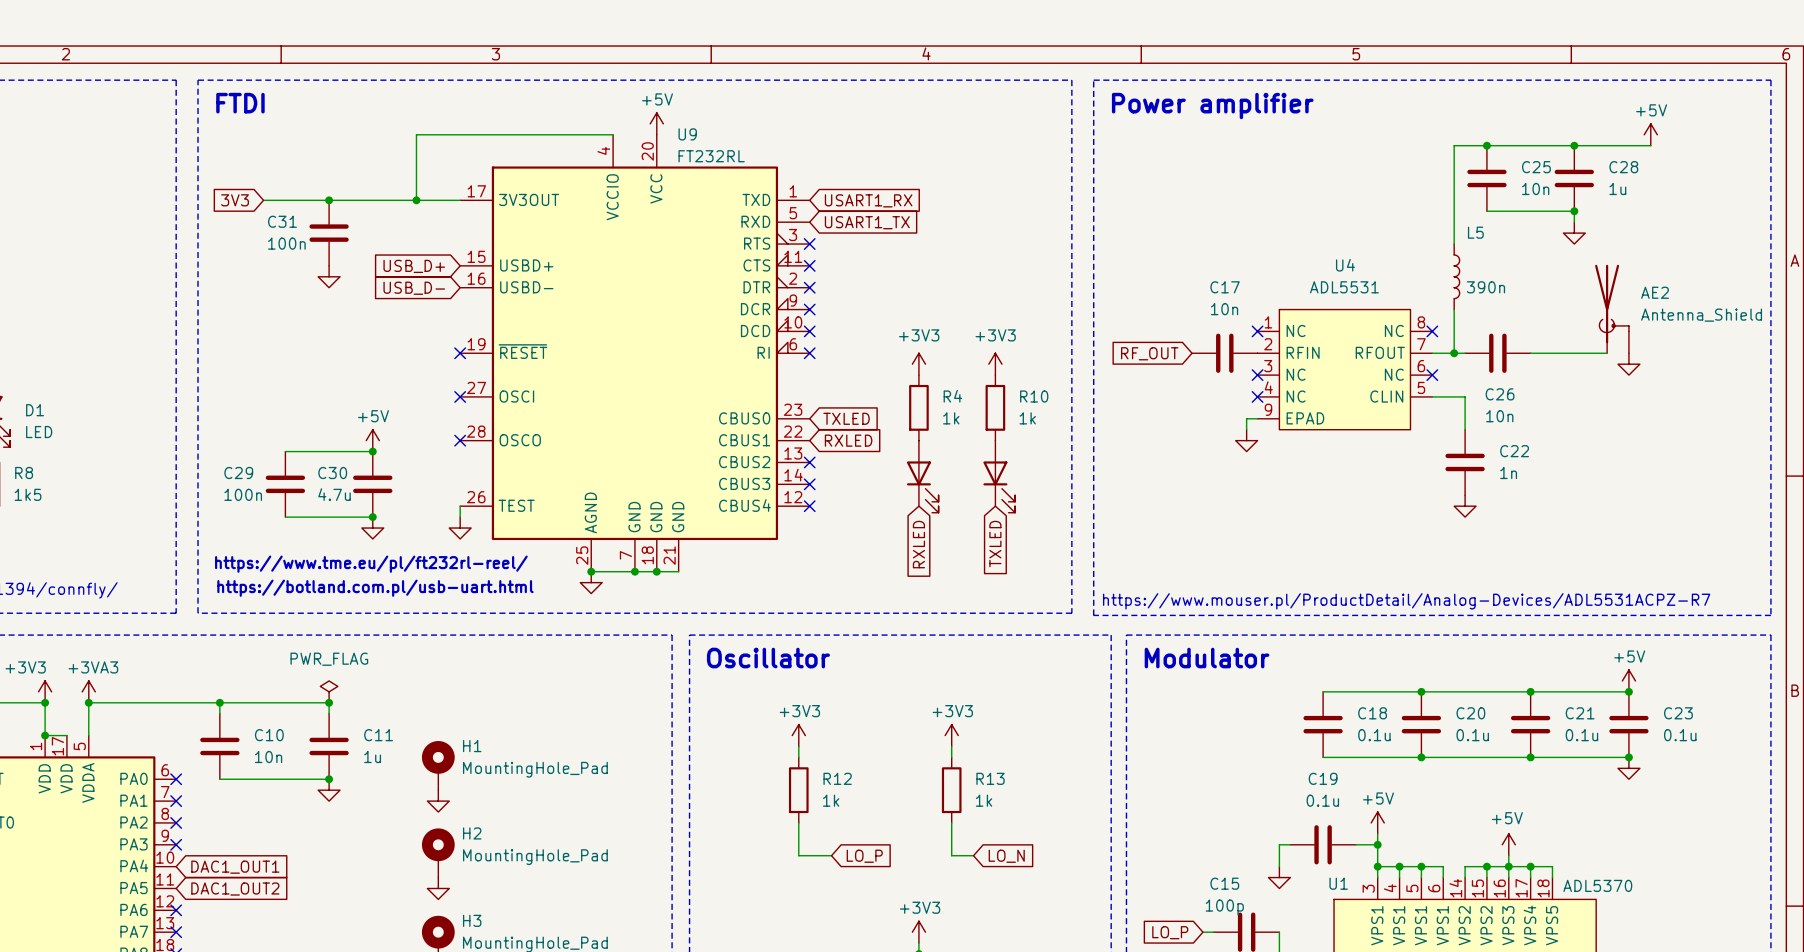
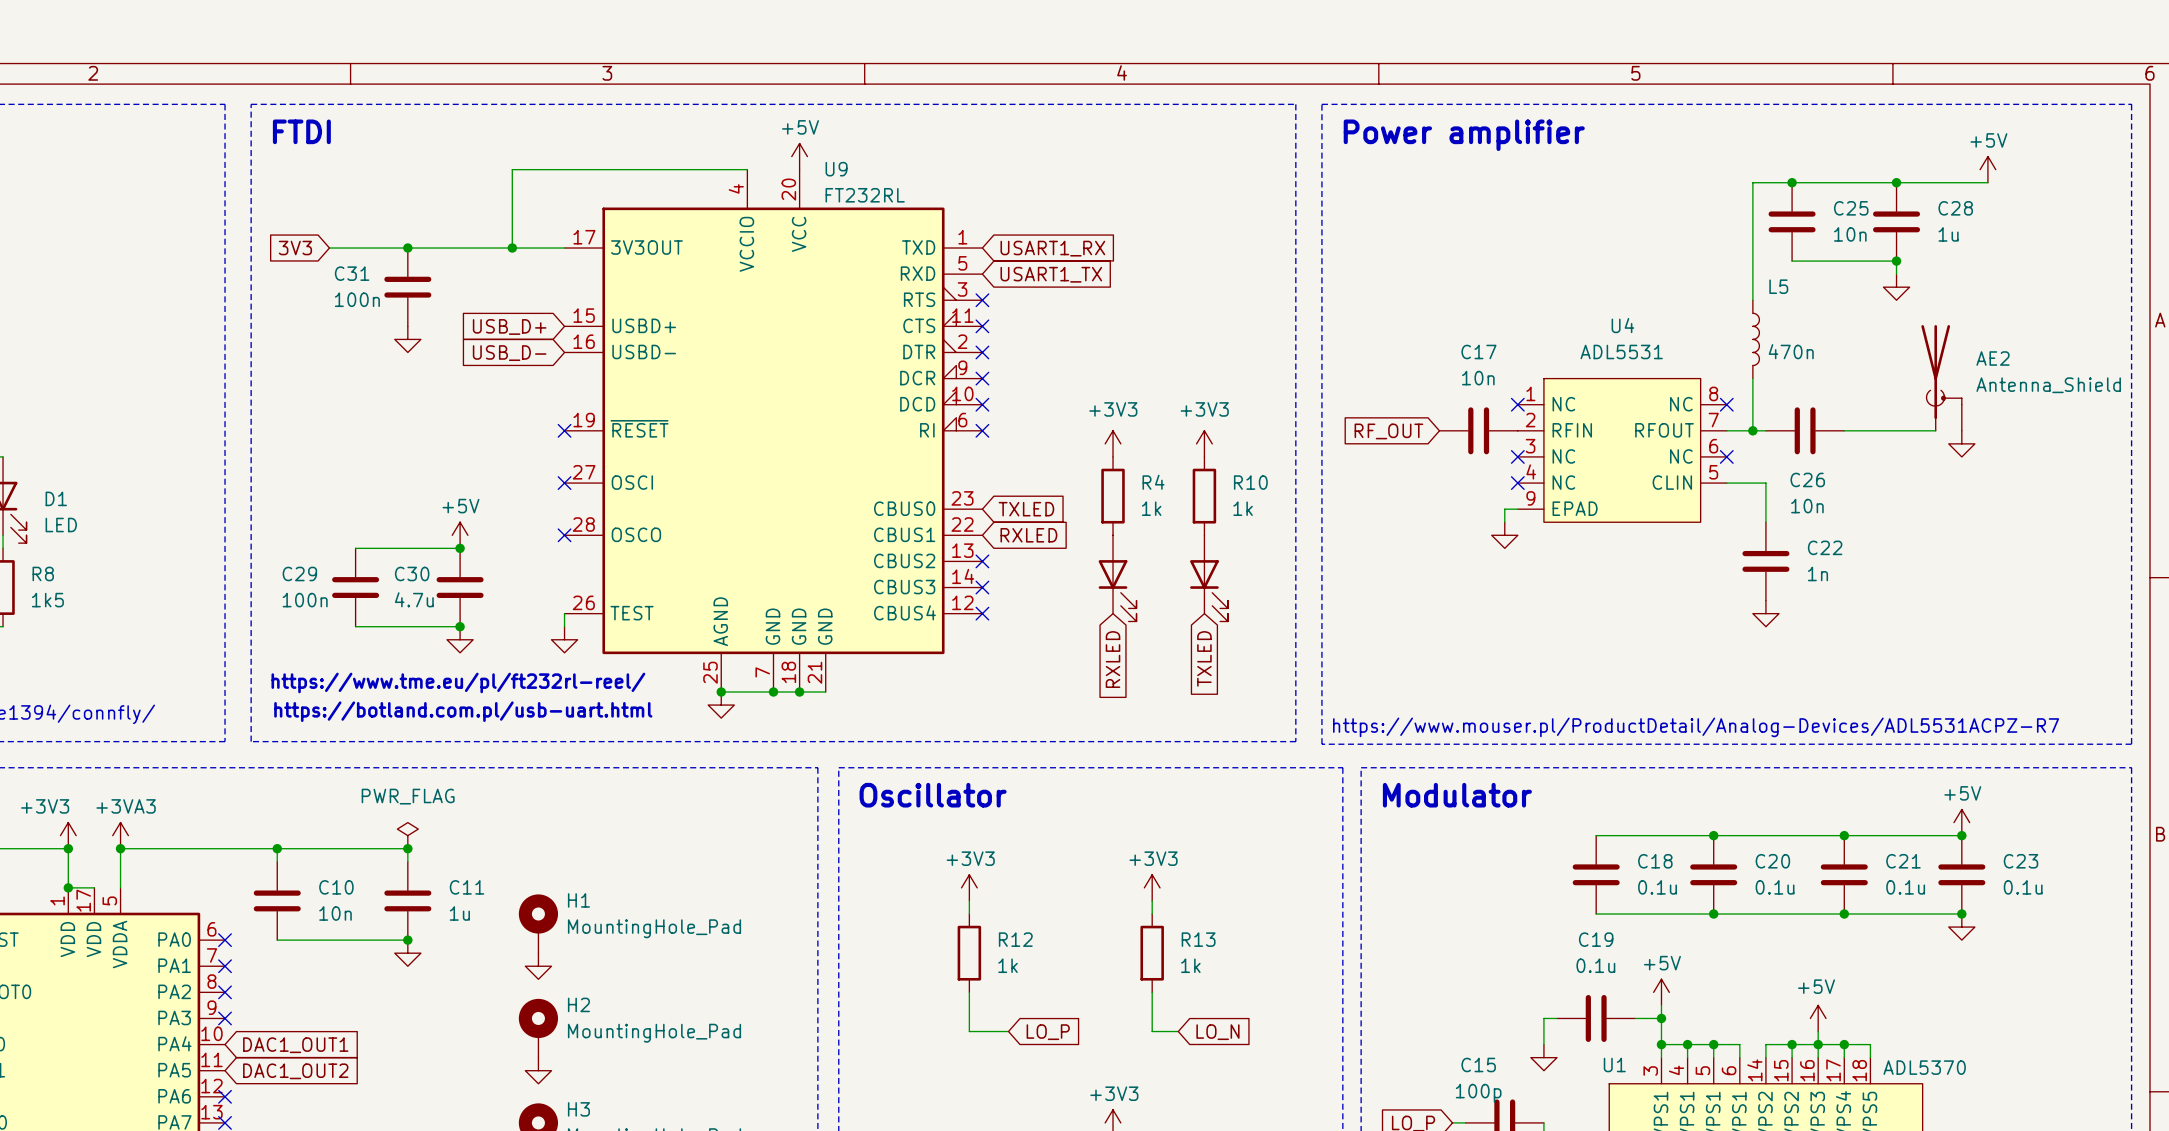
L5 value: 390n (1485, 287) -> 470n (1791, 351)

